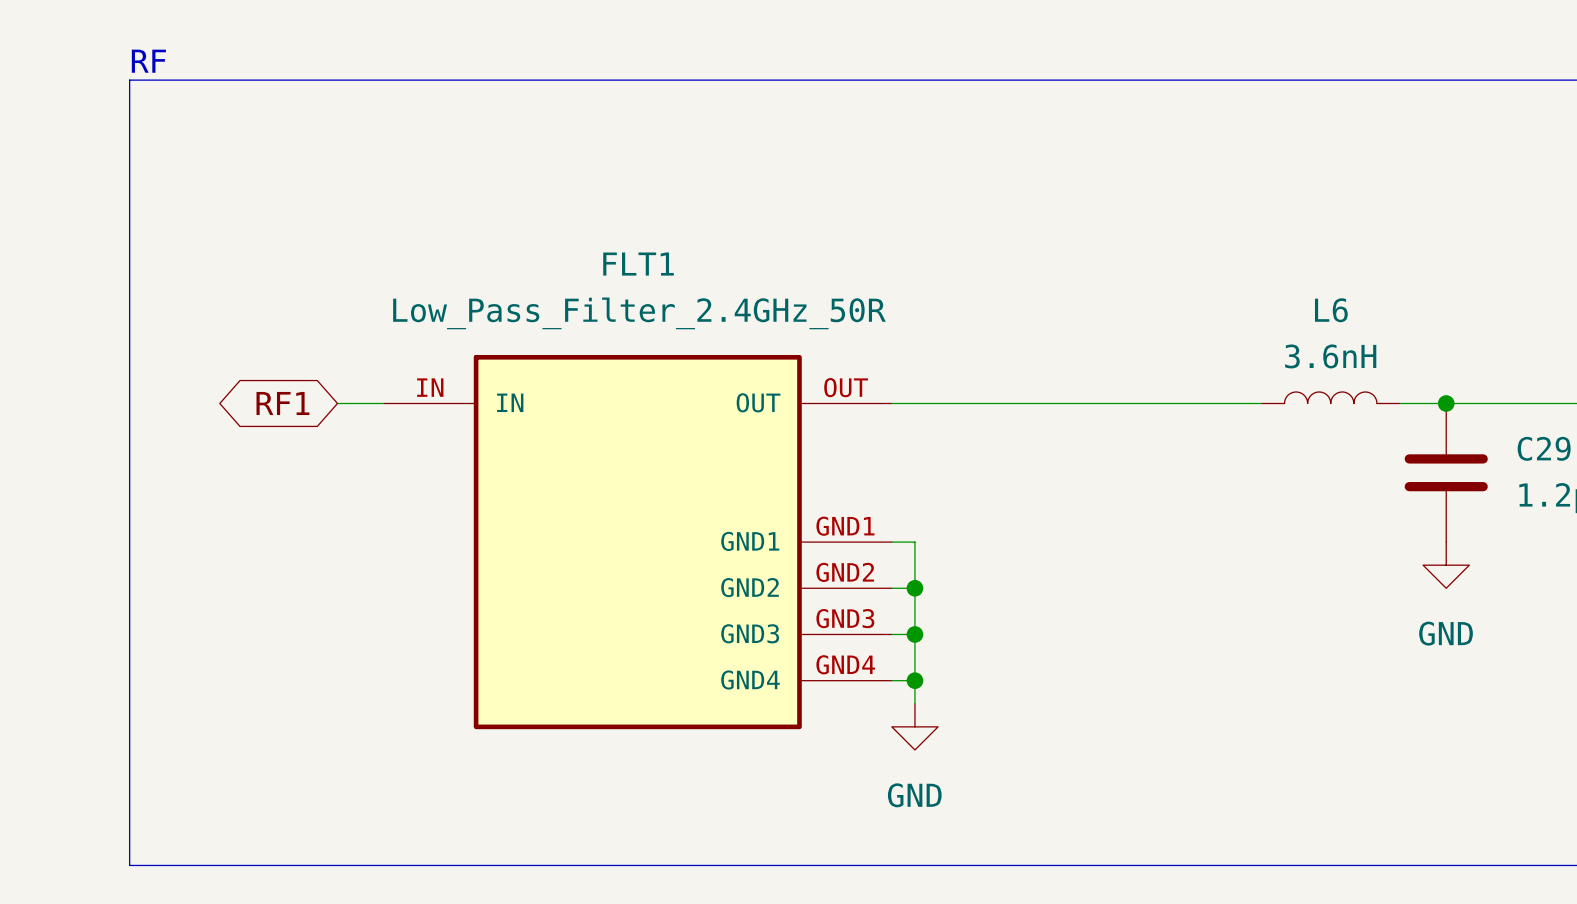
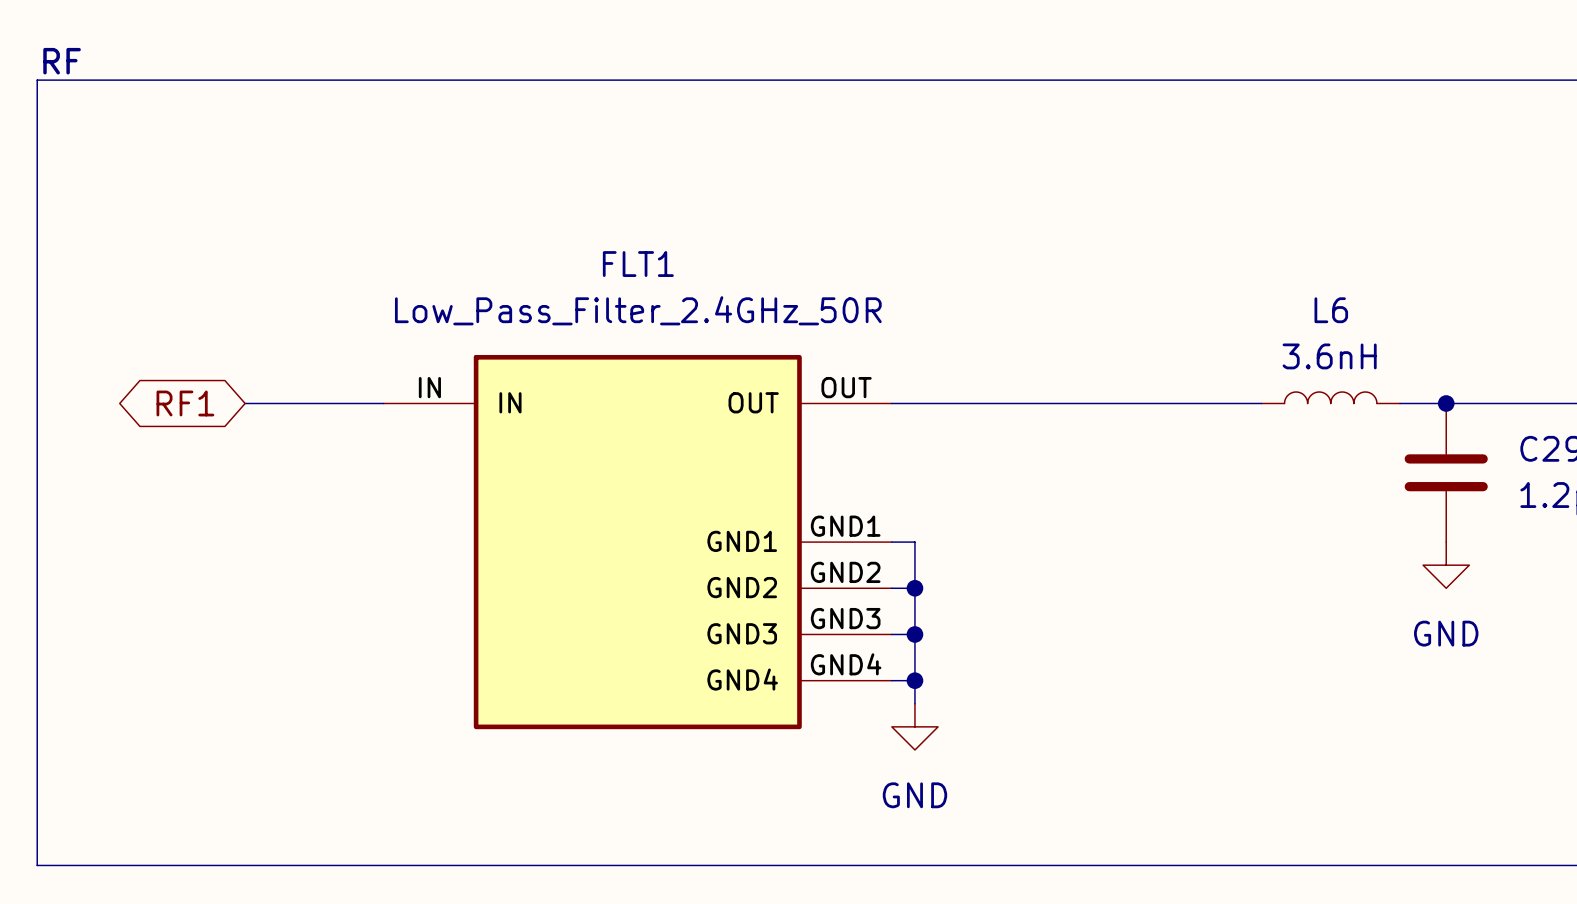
text position: RF (148, 61) -> RF (62, 61)
line: (129, 80) (129, 865) -> (129, 80) (37, 80) (37, 865) (129, 865)
wire: none -> (245, 403) (337, 403)
global label position: RF1 (282, 403) -> RF1 (185, 403)

